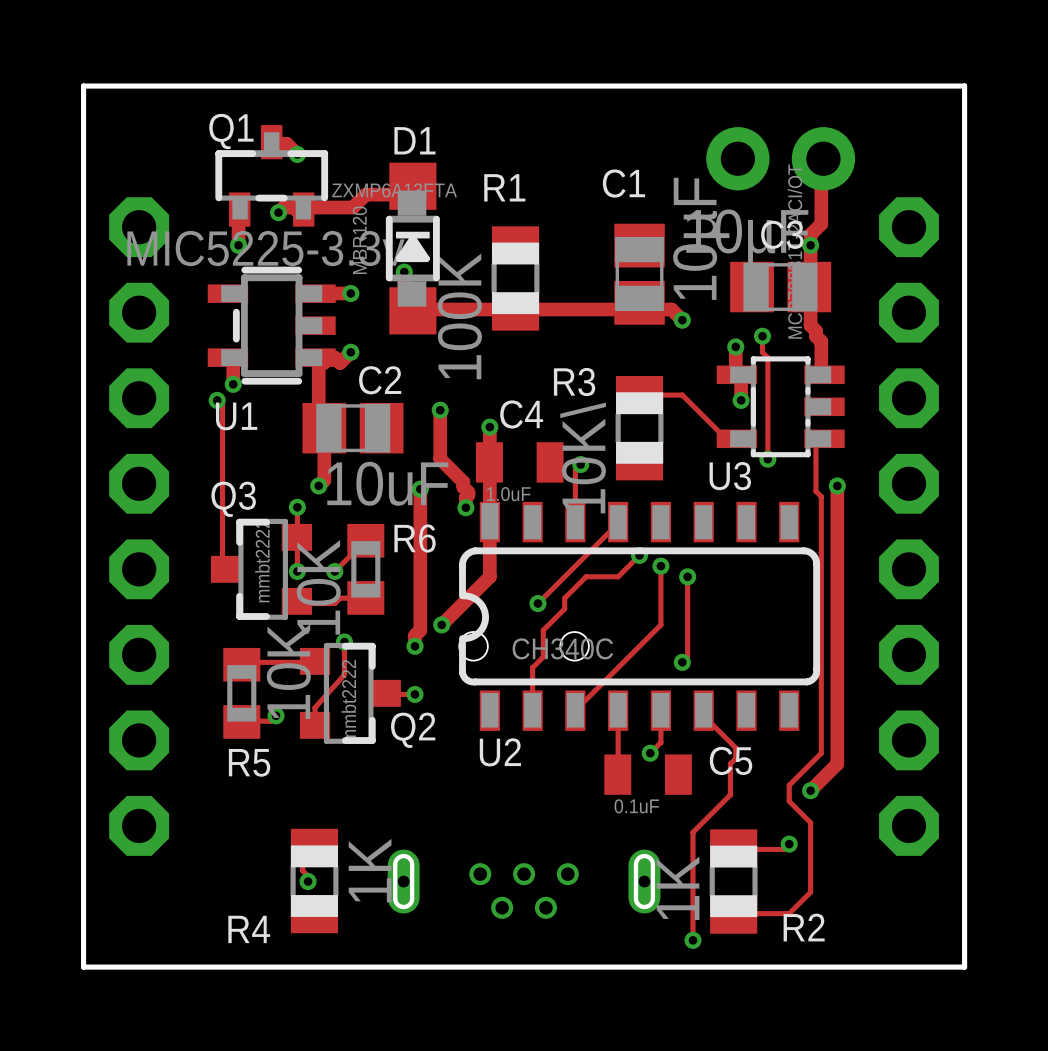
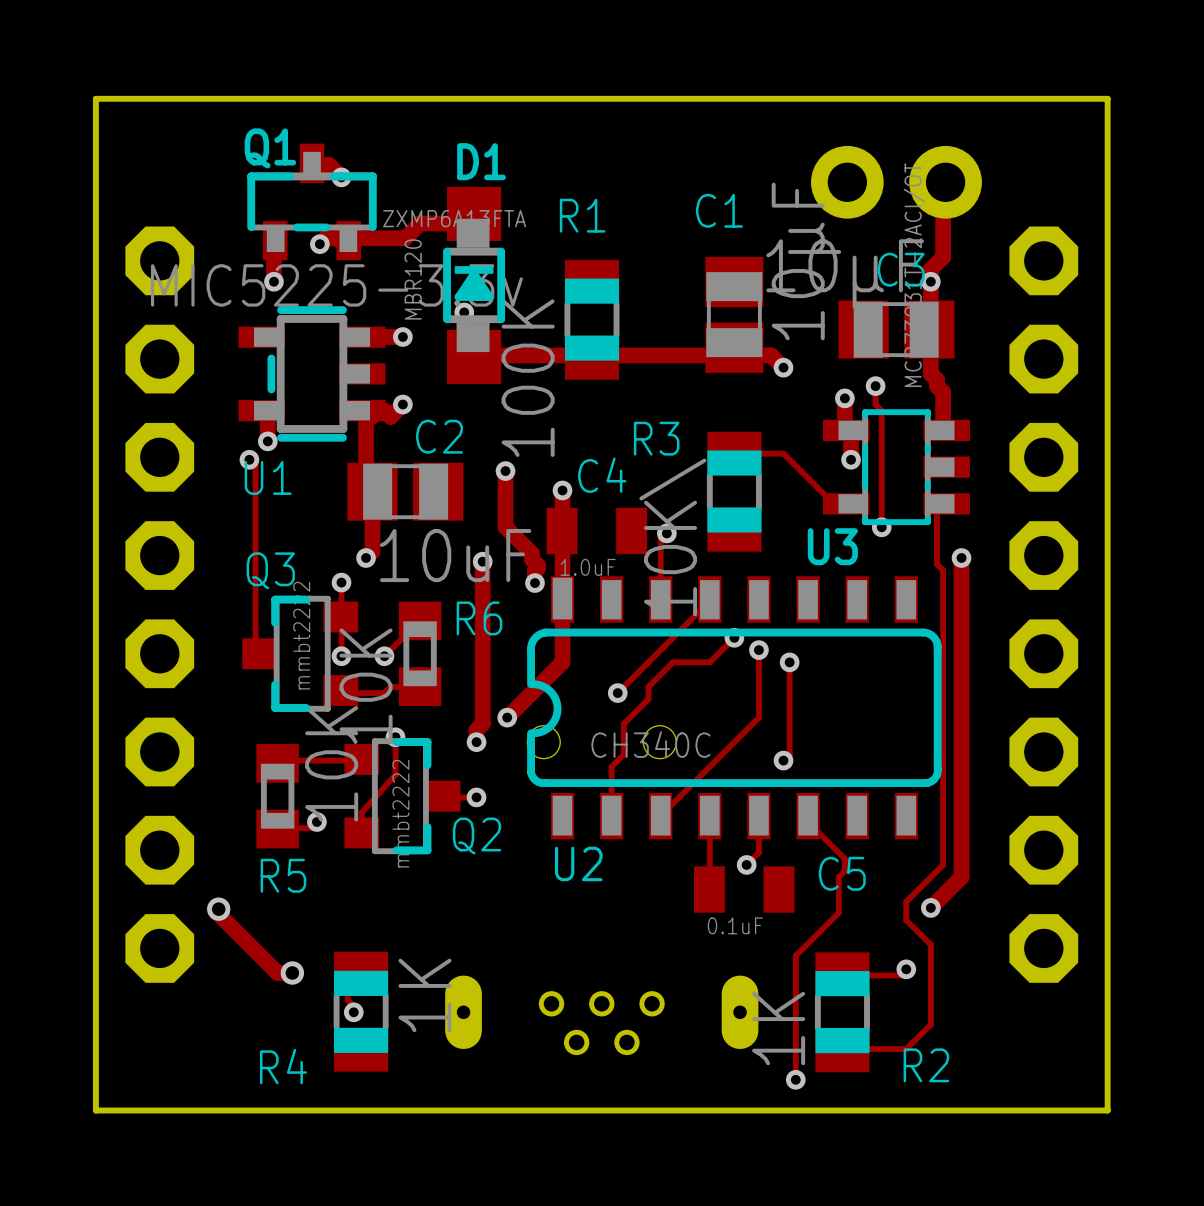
track: none -> (218, 909) (218, 914) (277, 973) (292, 973)
via: none -> (218, 909)
via: none -> (292, 973)

